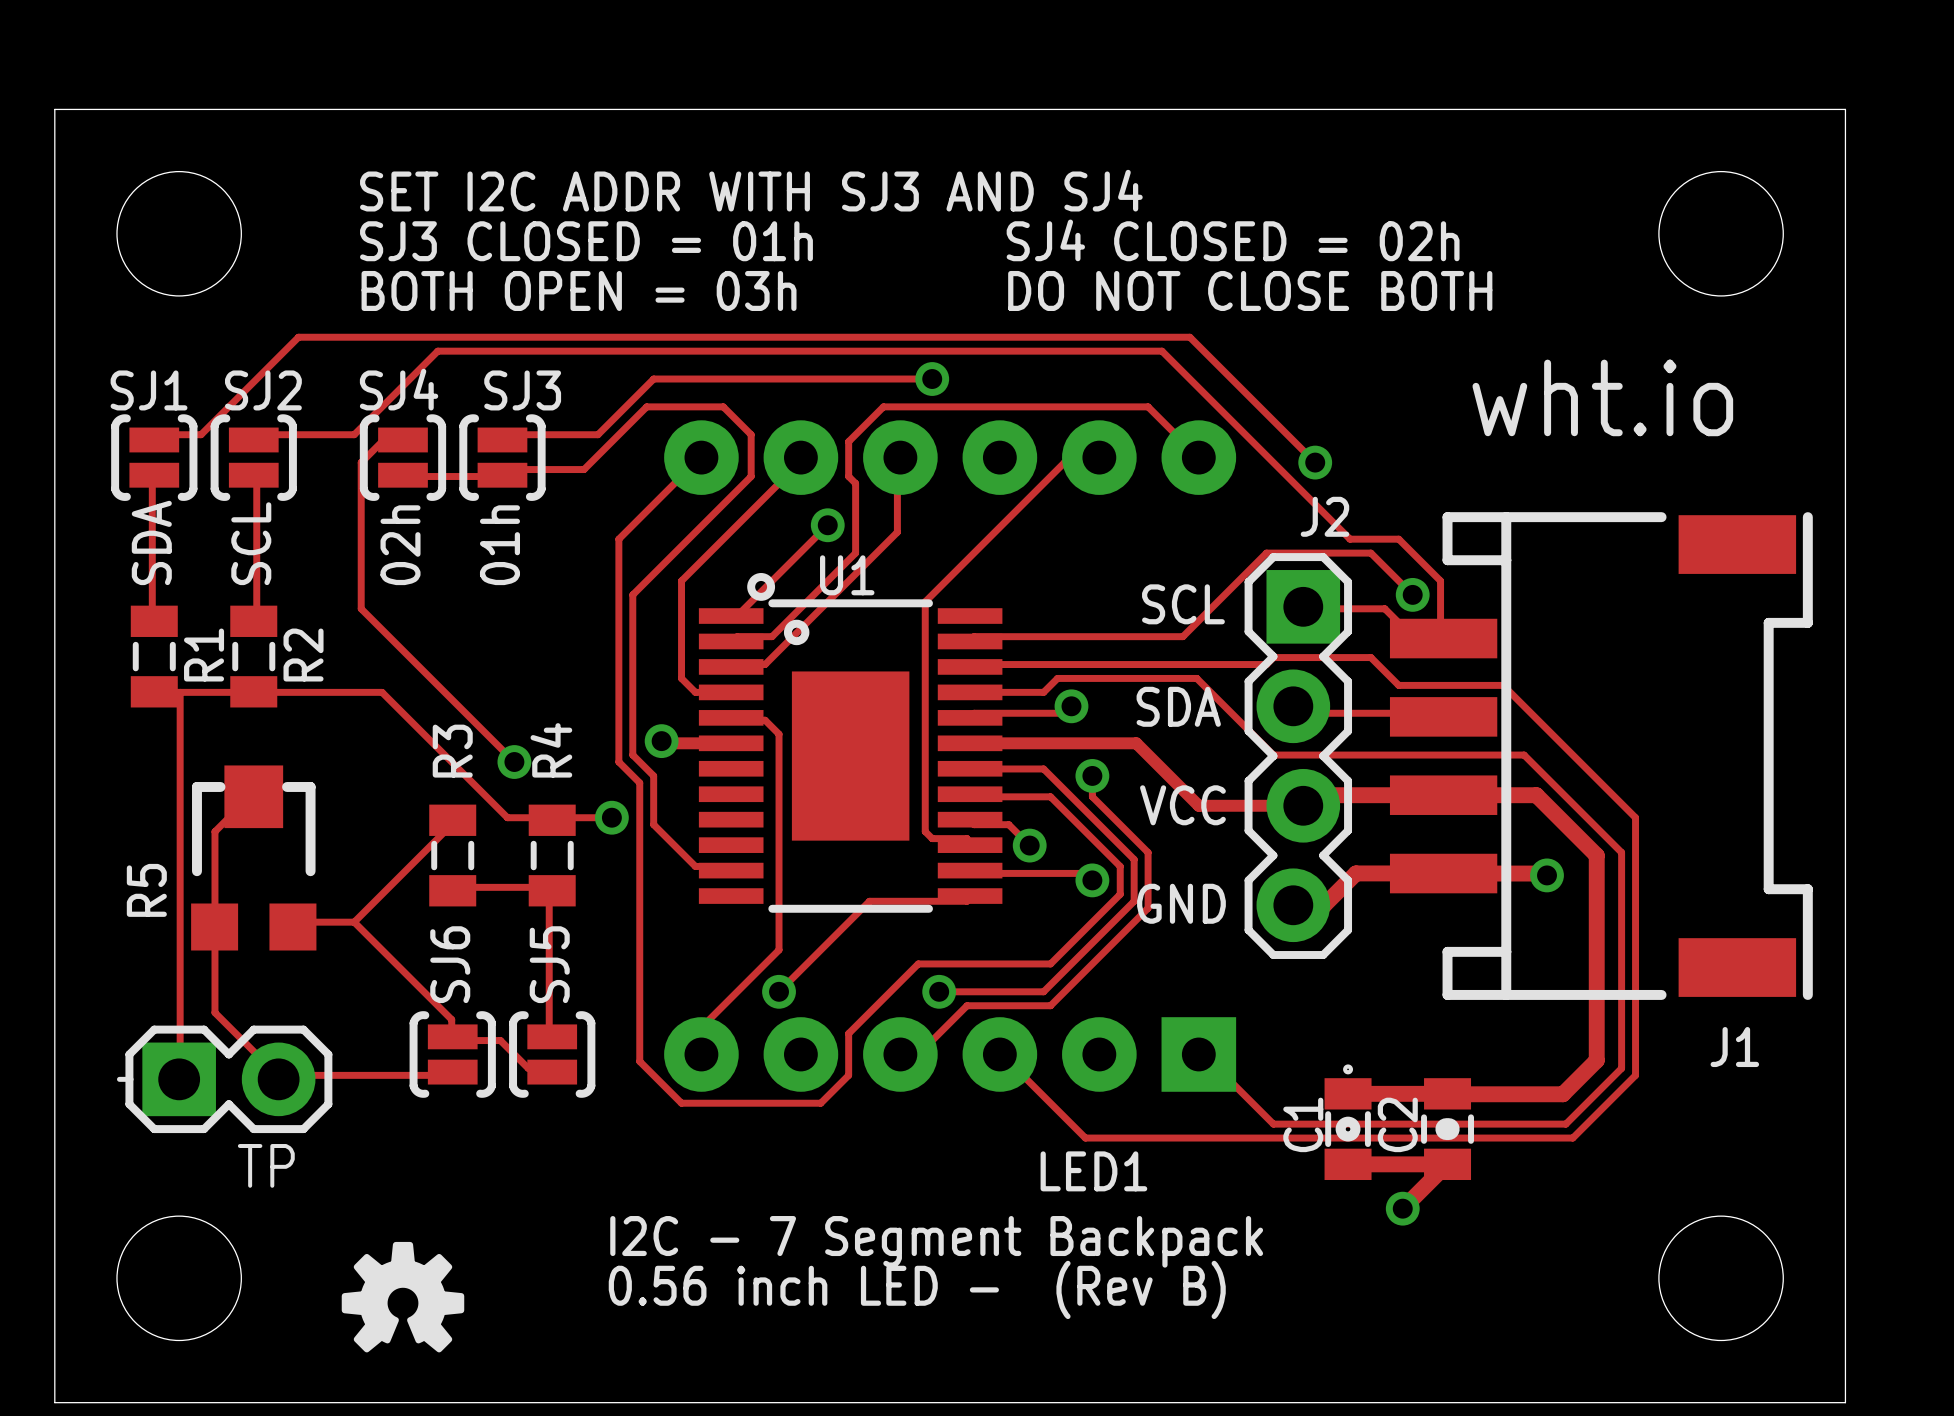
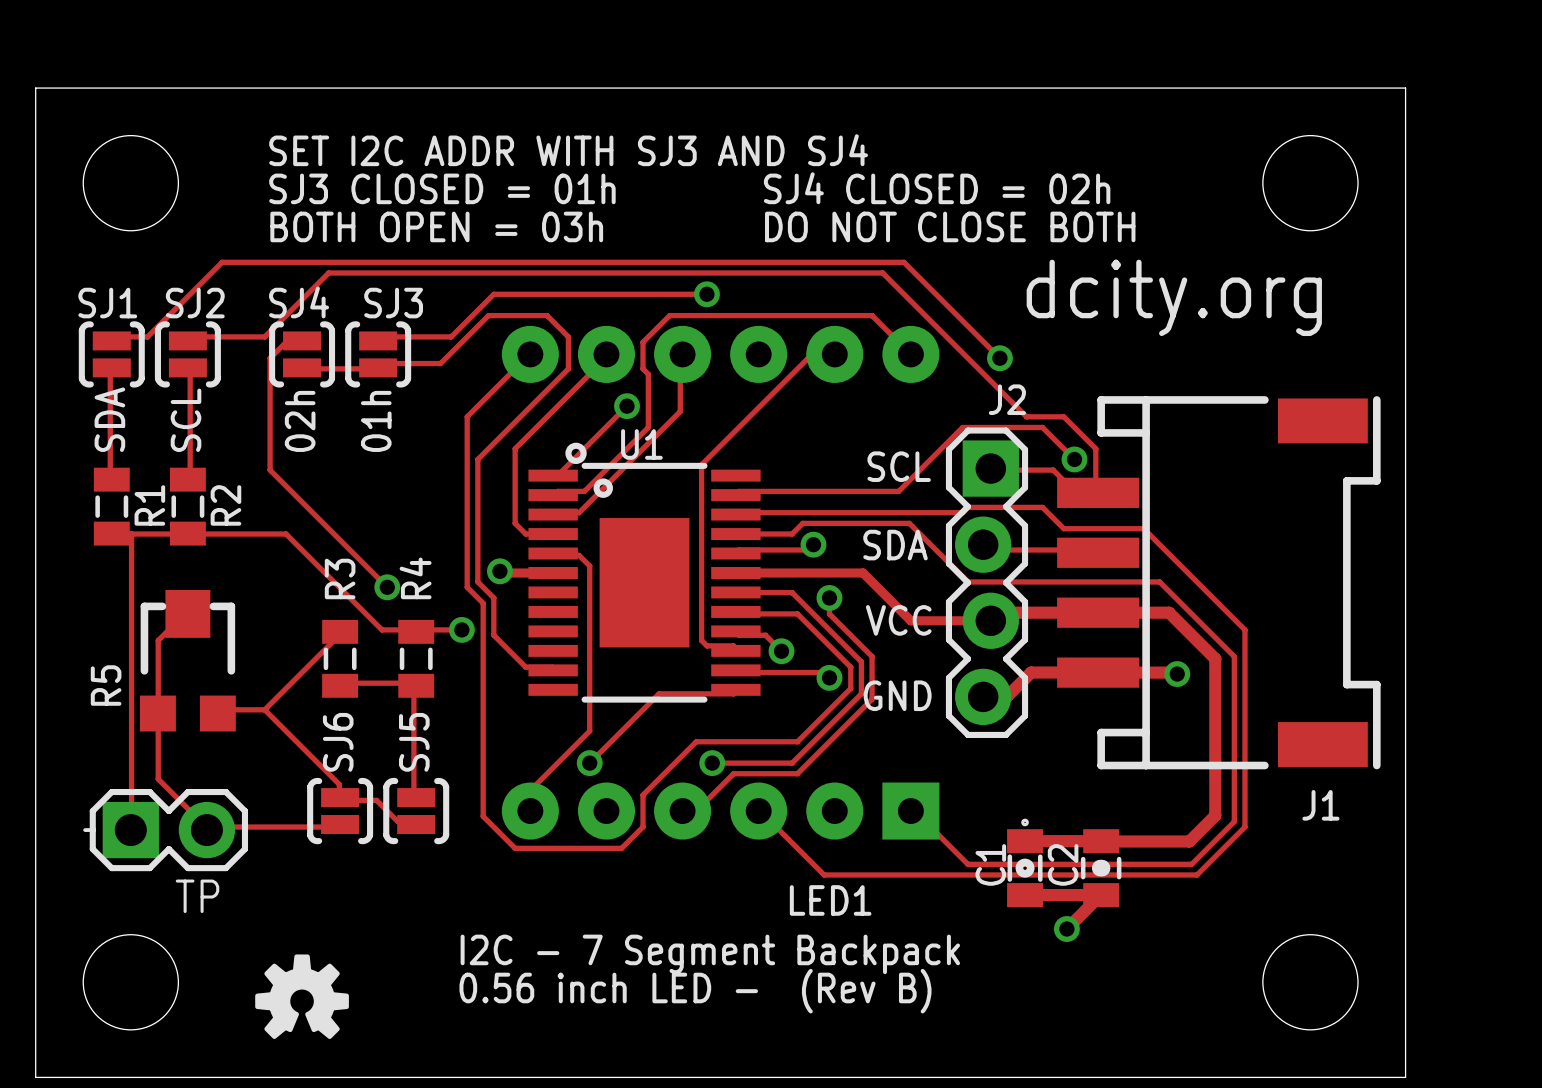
text: none -> dcity.org (1174, 297)
text: wht.io (1602, 397) -> none

